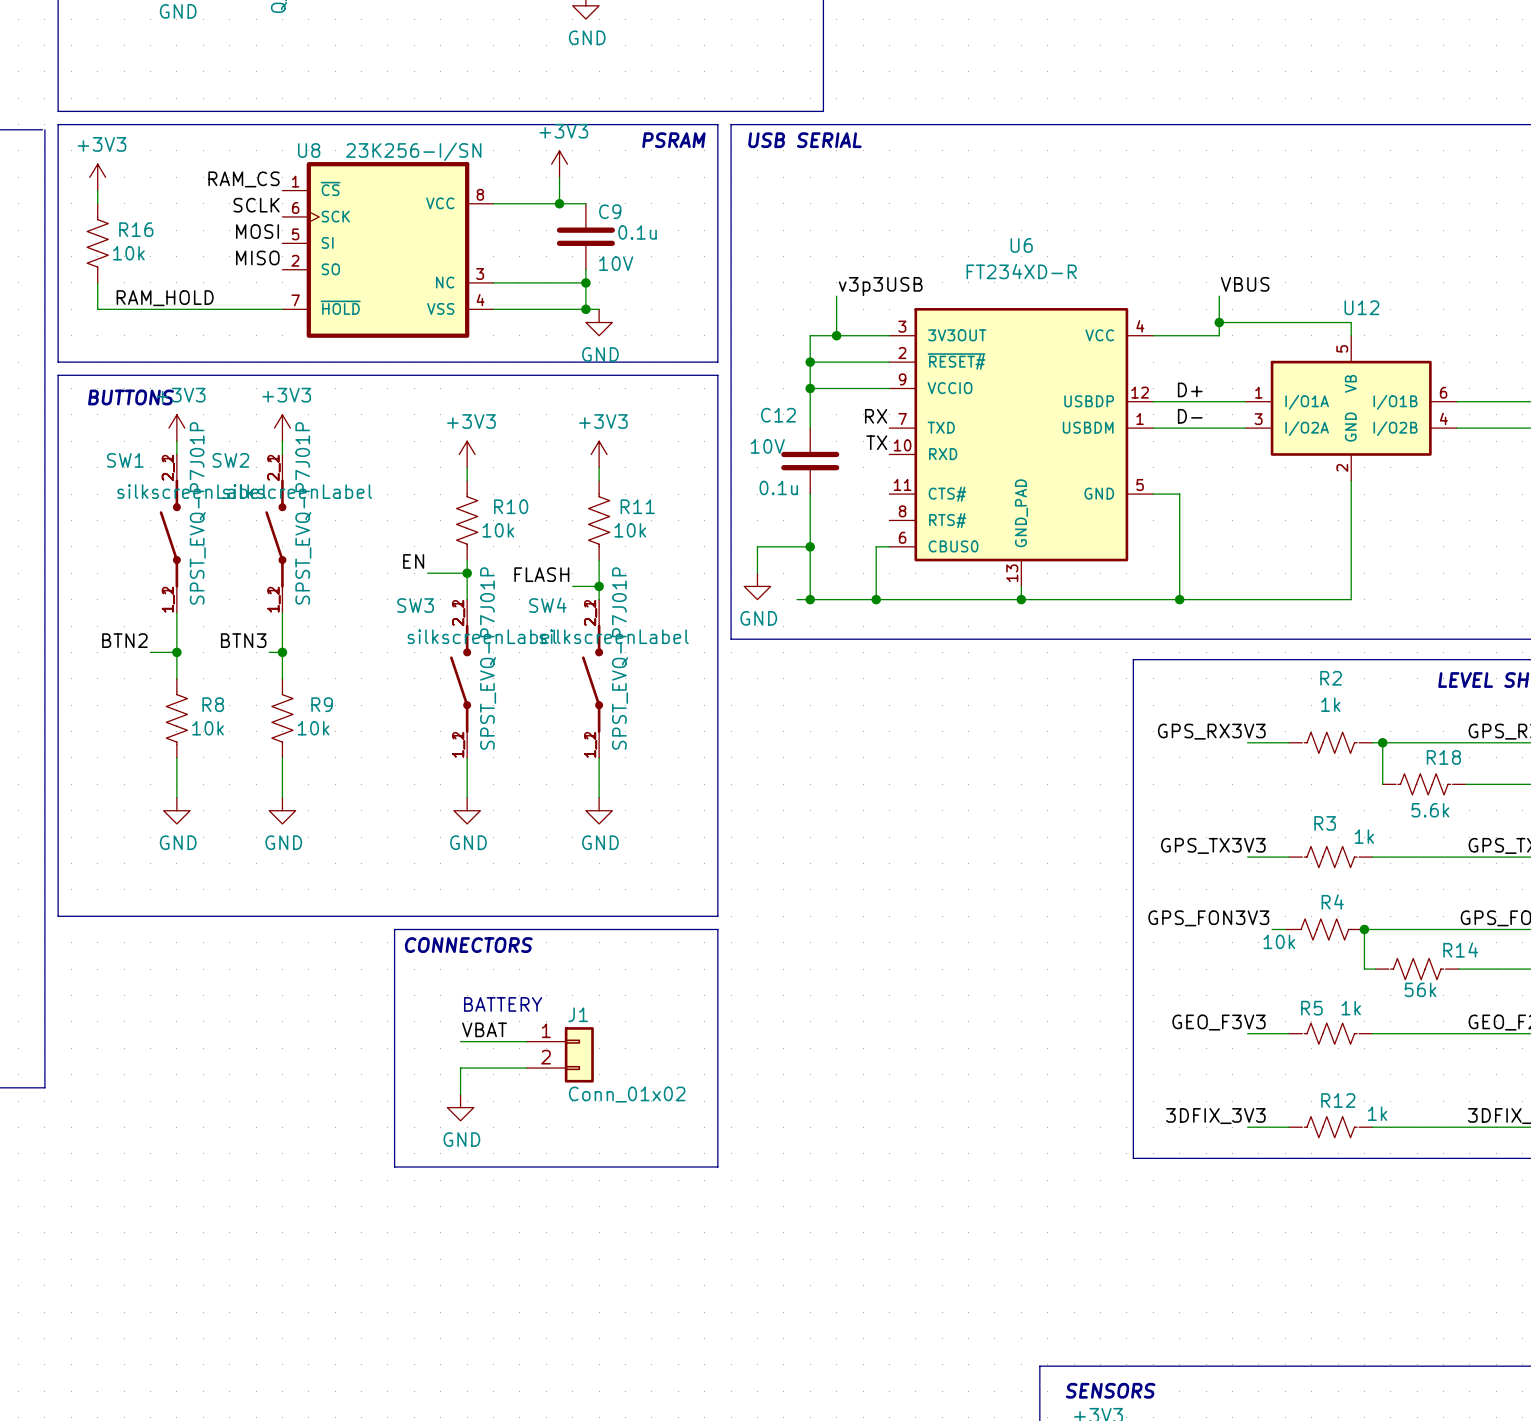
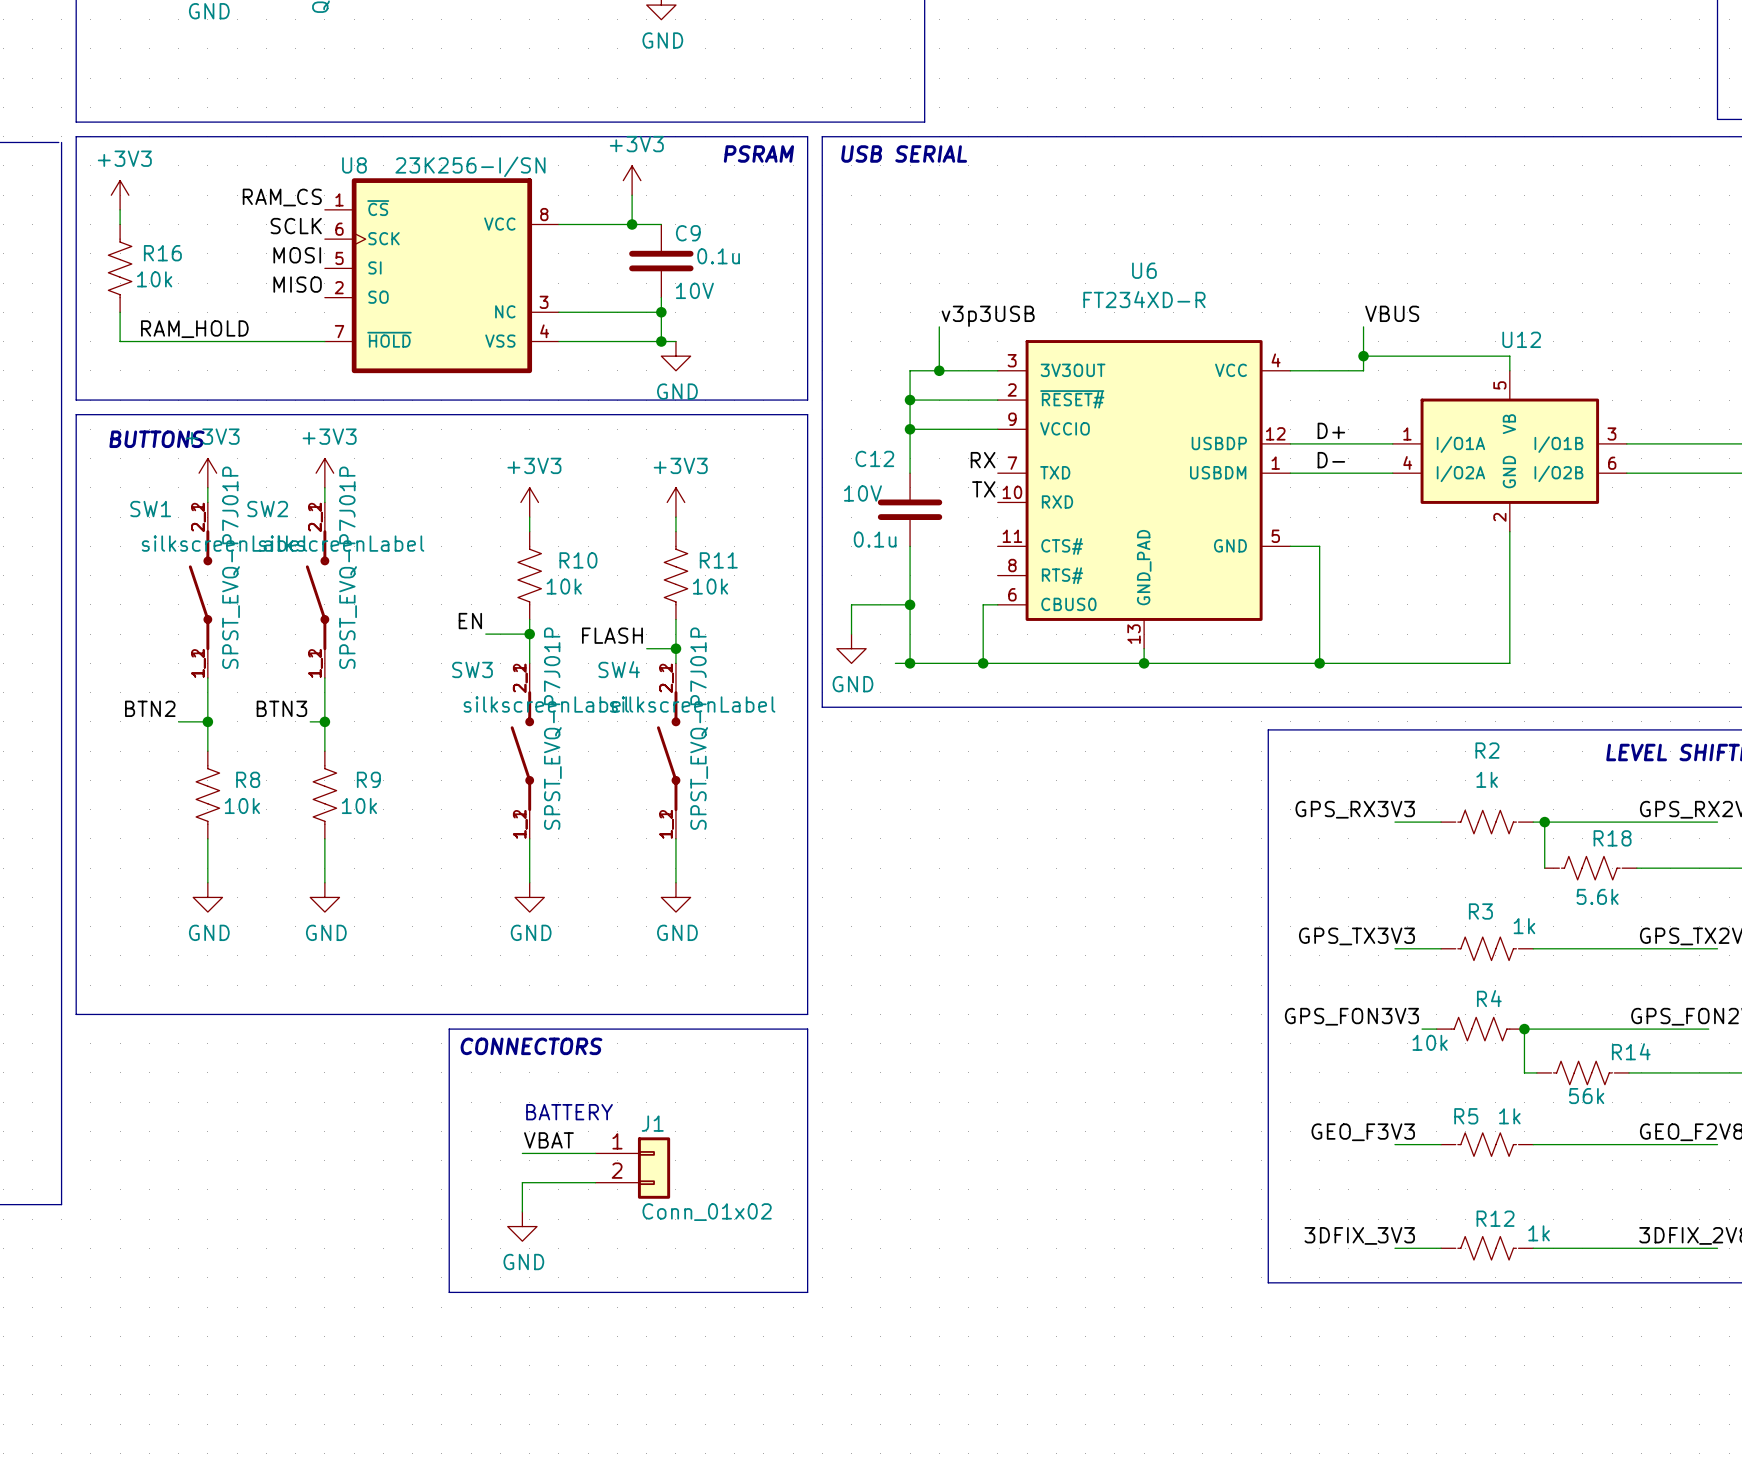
U12 pin number: 6 (1443, 392) -> 3 (1611, 433)
U12 pin number: 4 (1443, 418) -> 6 (1612, 463)
U12 pin number: 3 (1258, 419) -> 4 (1407, 462)

